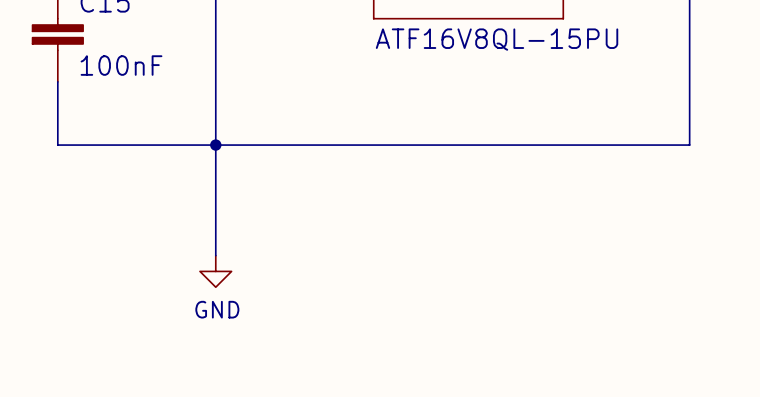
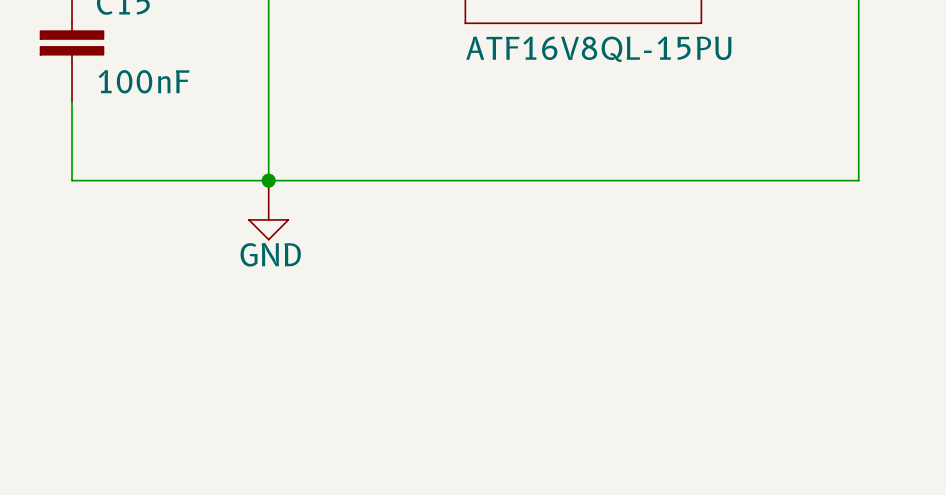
wire: (215, 145) (215, 255) -> none
power symbol: none -> GND (268, 210)
power symbol: GND (215, 271) -> none

